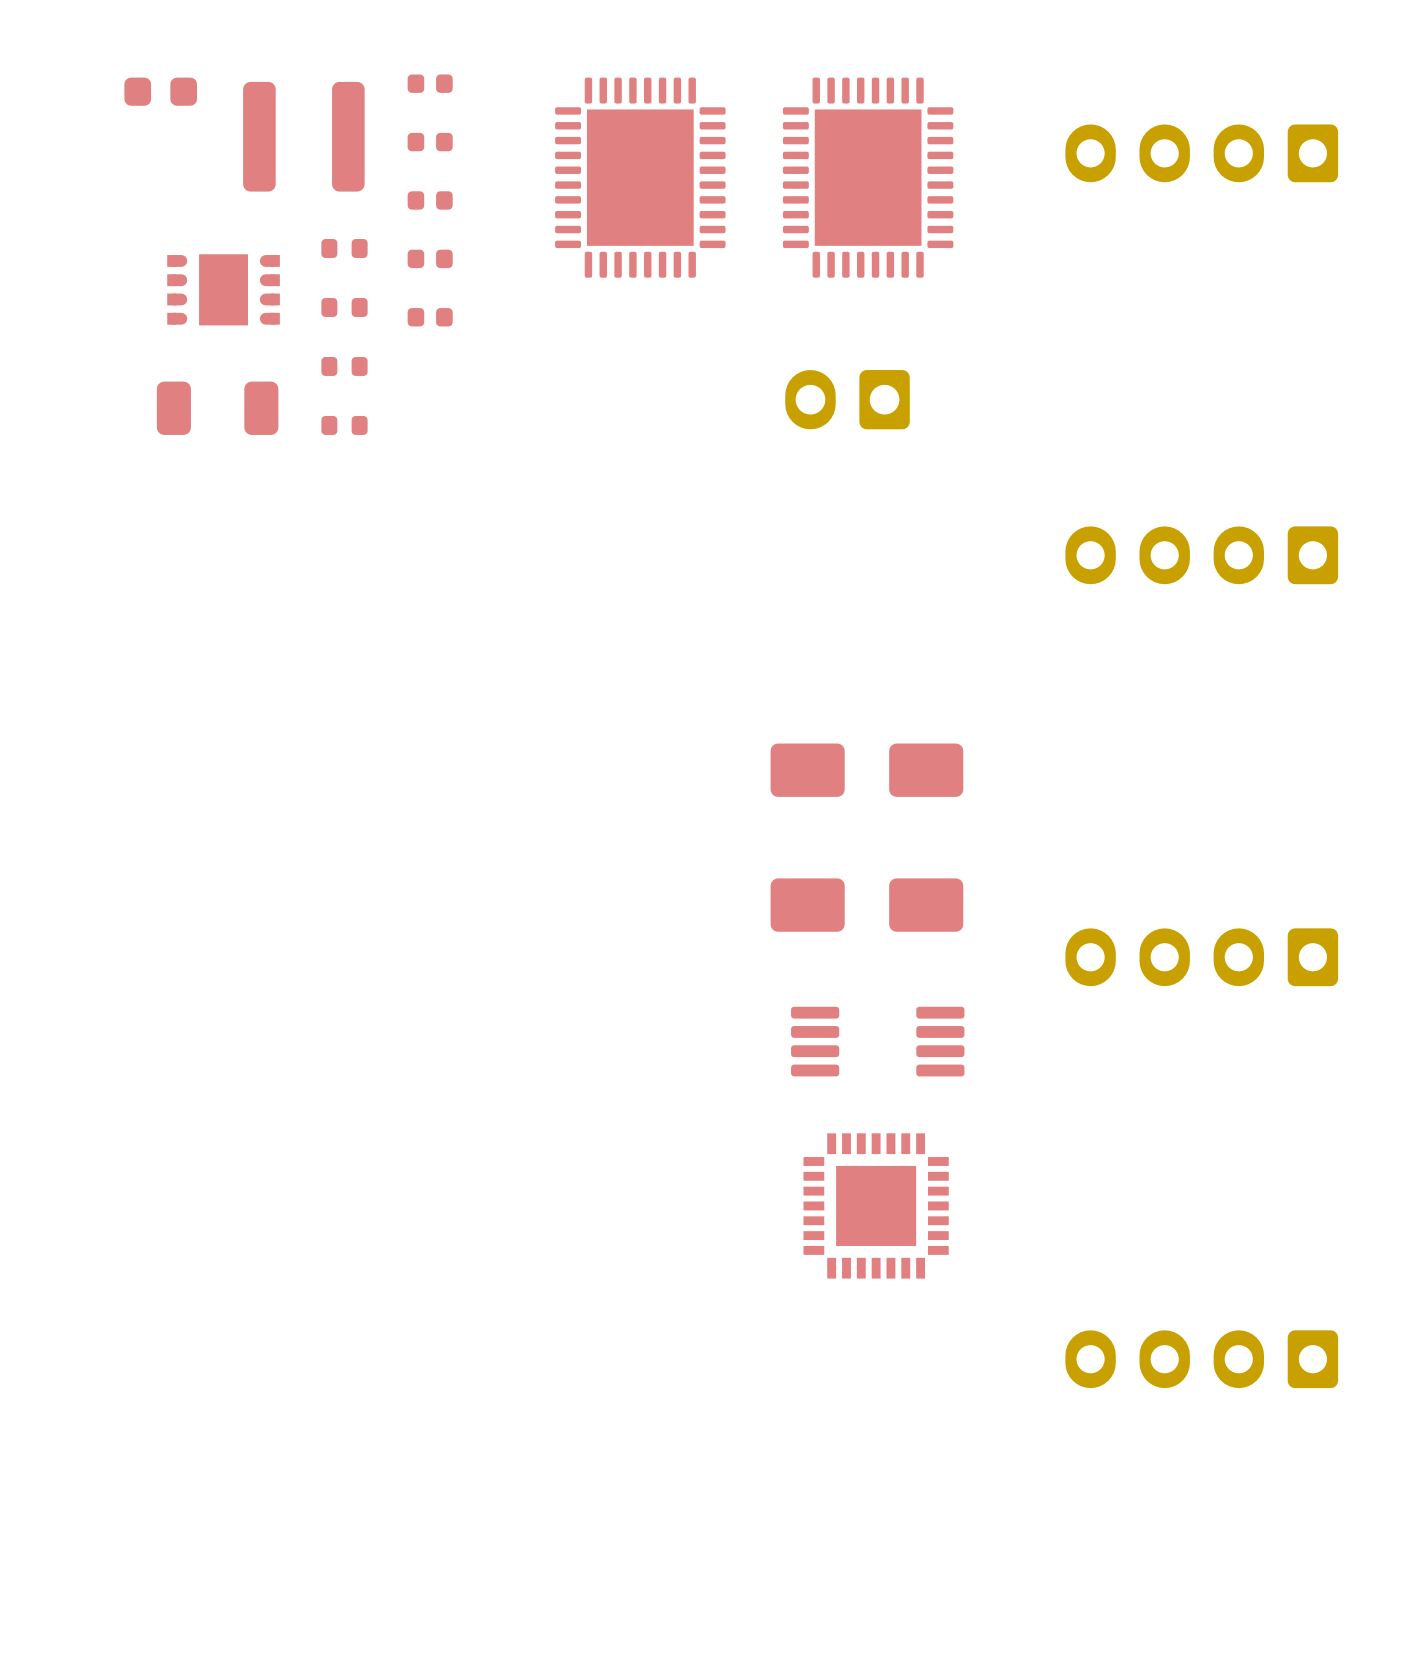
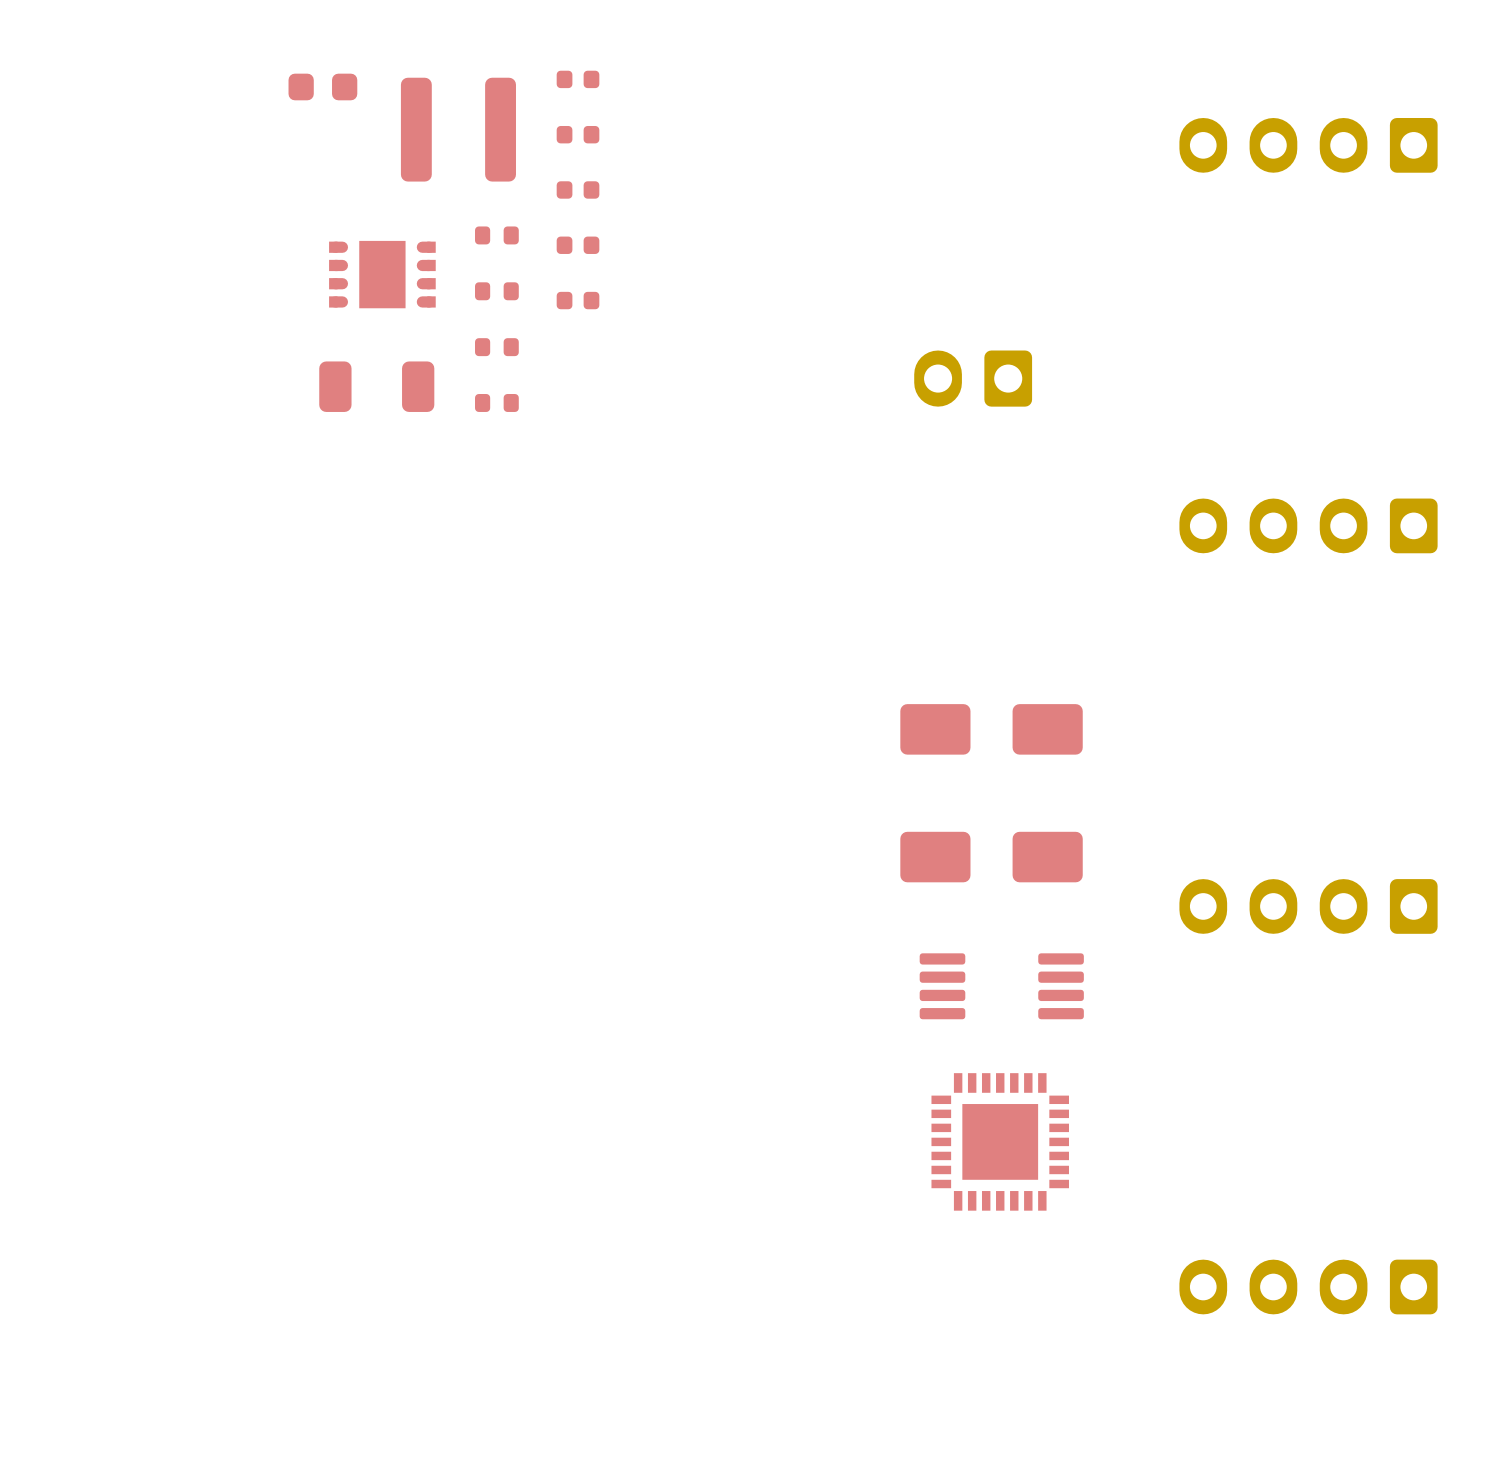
part: (640, 177) -> none
part: (868, 177) -> none

